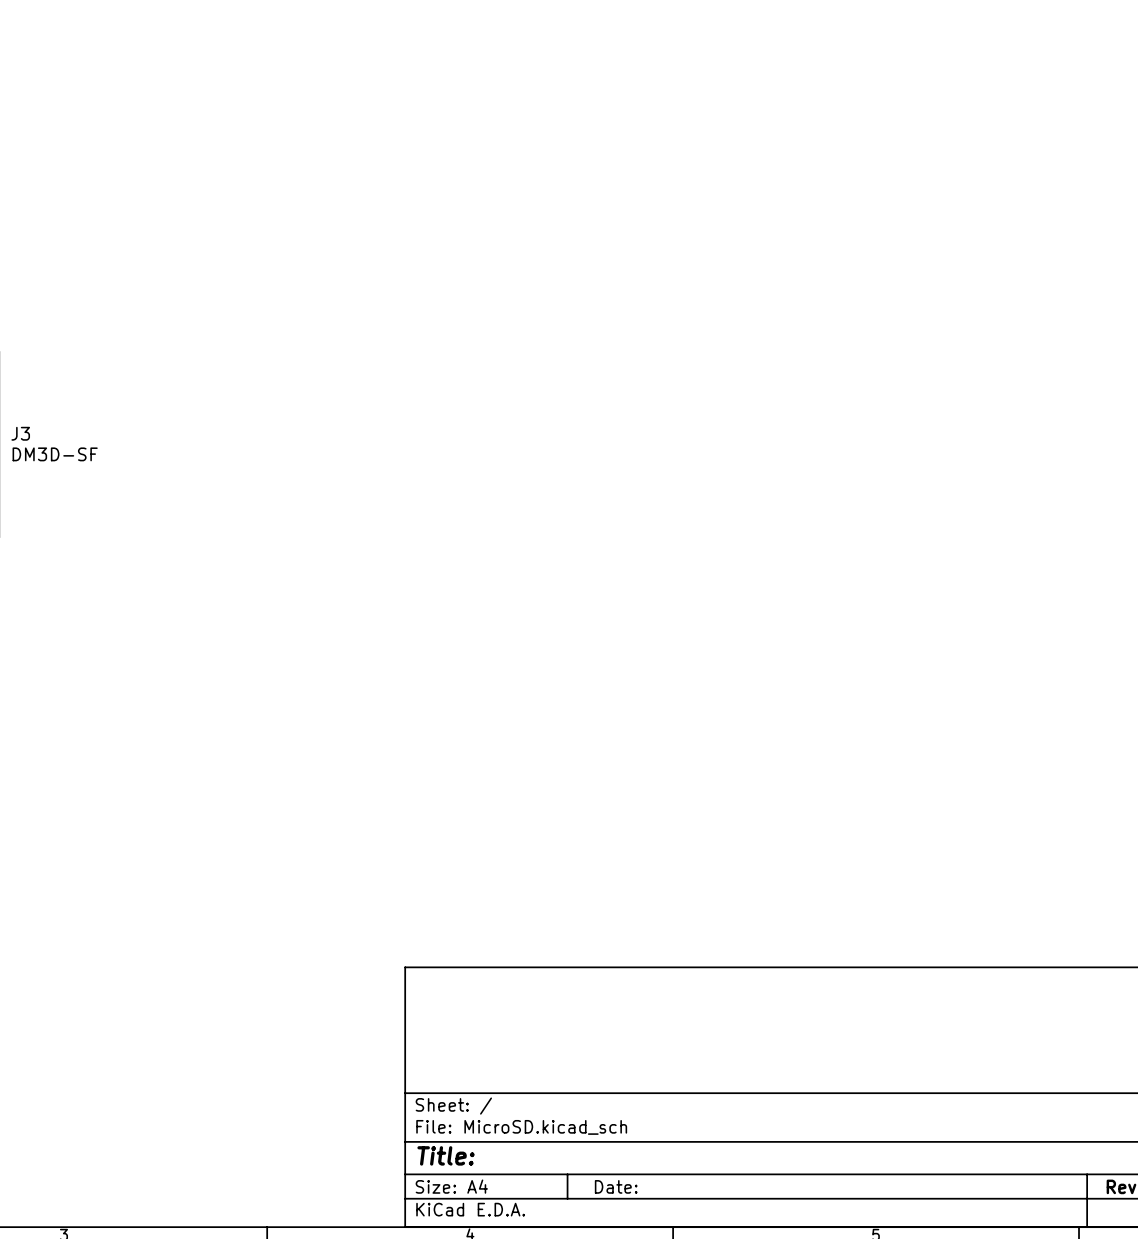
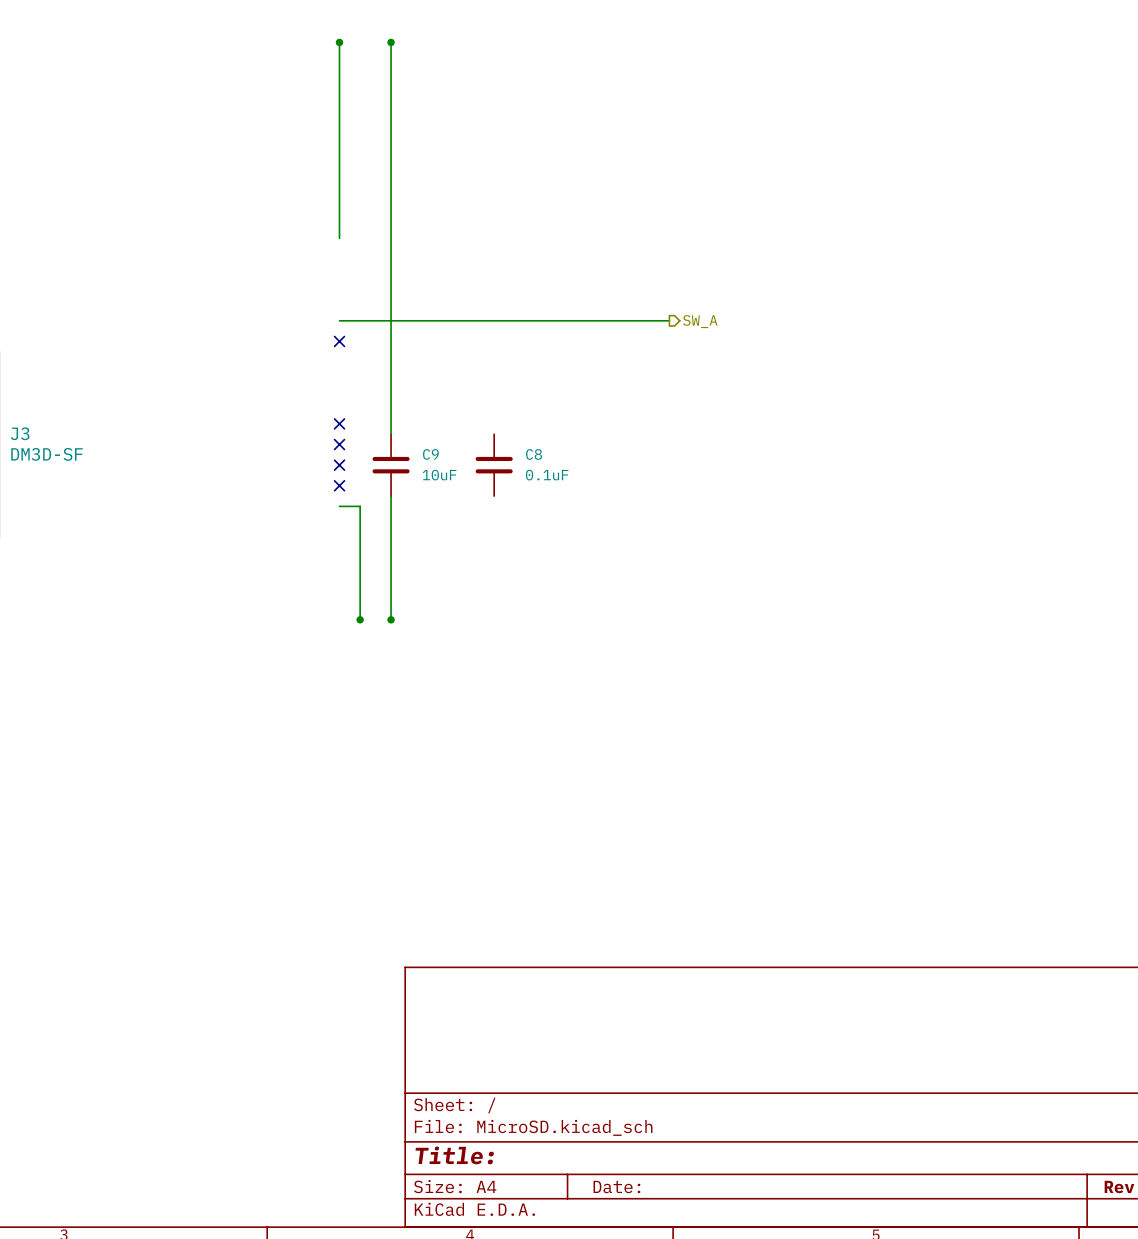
wire: none -> (339, 42) (339, 238)
junction: none -> (339, 42)
wire: none -> (391, 42) (391, 434)
junction: none -> (391, 42)
wire: none -> (339, 320) (669, 320)
hierarchical label: none -> SW_A (700, 321)
no-connect mark: none -> (339, 341)
no-connect mark: none -> (339, 423)
no-connect mark: none -> (339, 444)
no-connect mark: none -> (339, 465)
C9: none -> 10uF (391, 465)
C8: none -> 0.1uF (494, 465)
no-connect mark: none -> (339, 485)
wire: none -> (391, 496) (391, 619)
wire: none -> (339, 506) (360, 506) (360, 619)
junction: none -> (360, 619)
junction: none -> (391, 619)

